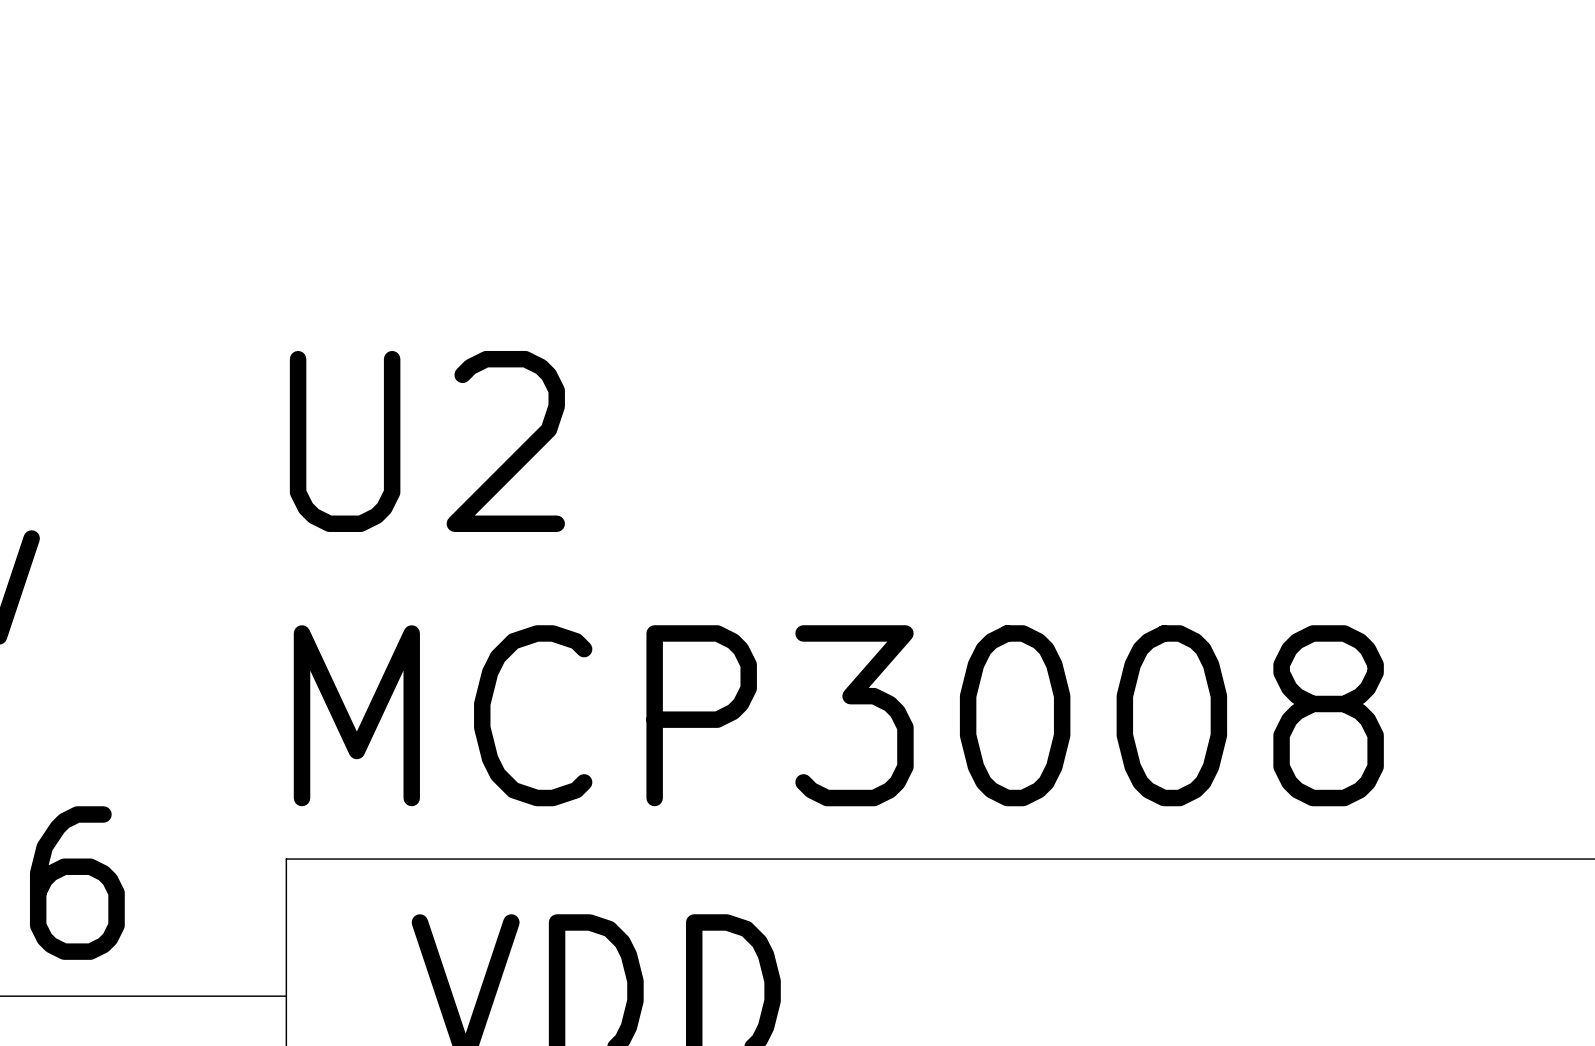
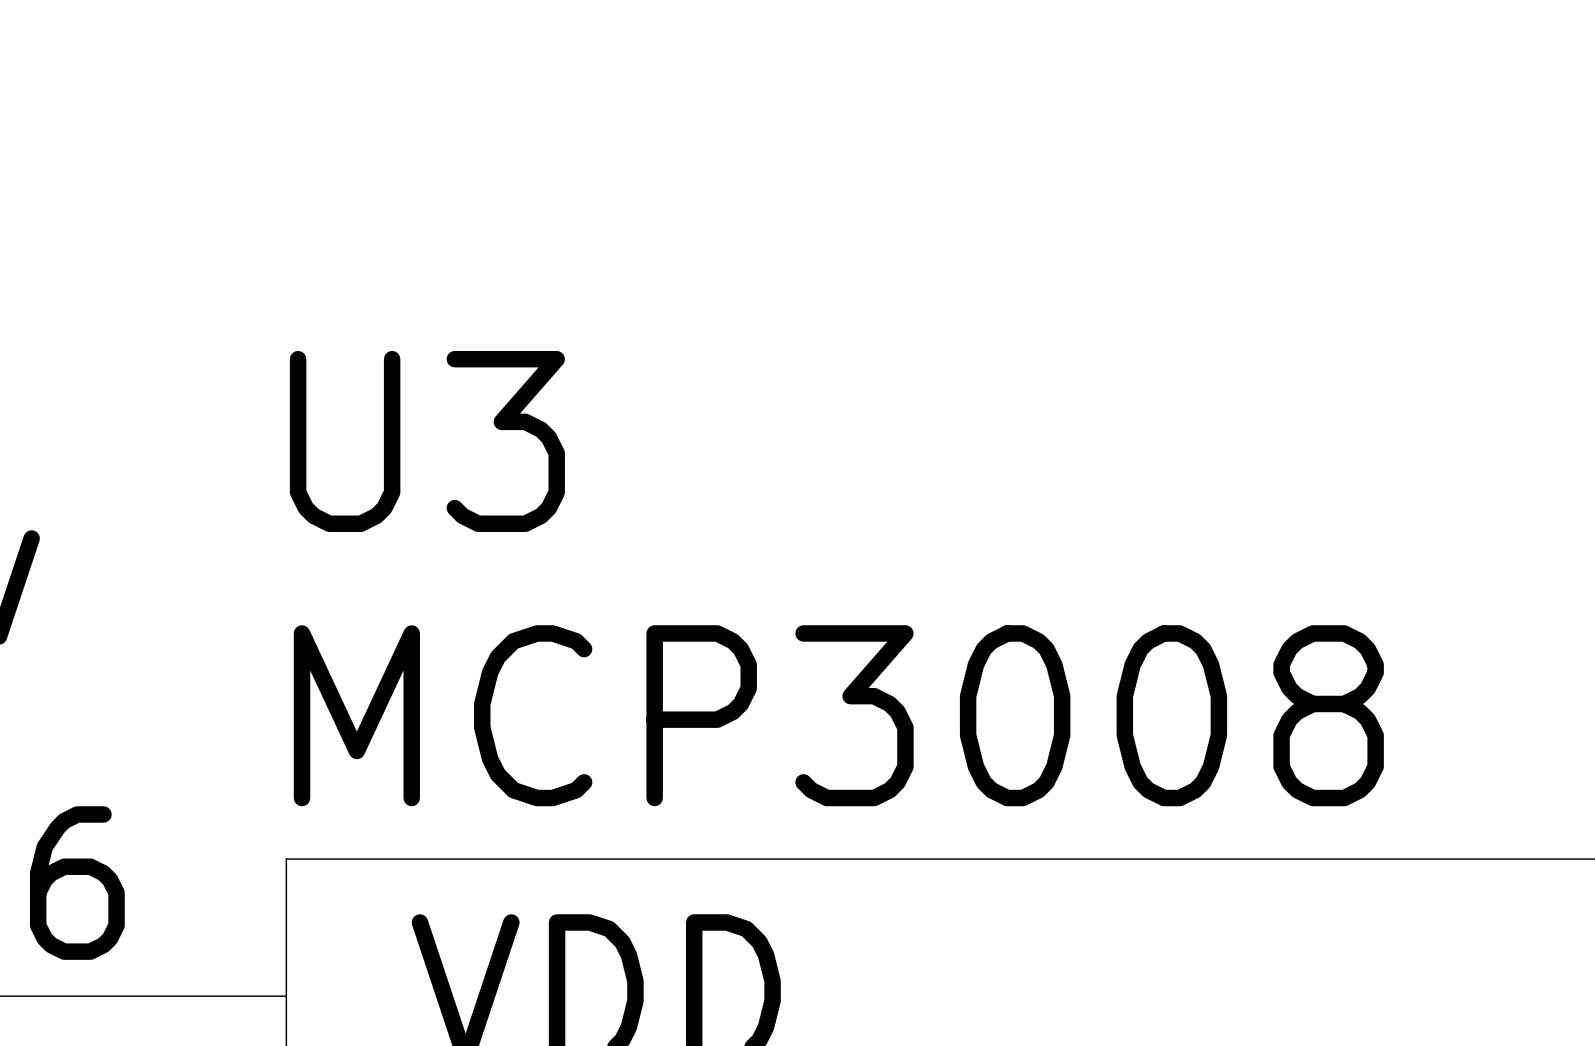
U2 name: U2 (427, 441) -> U3 (427, 441)

